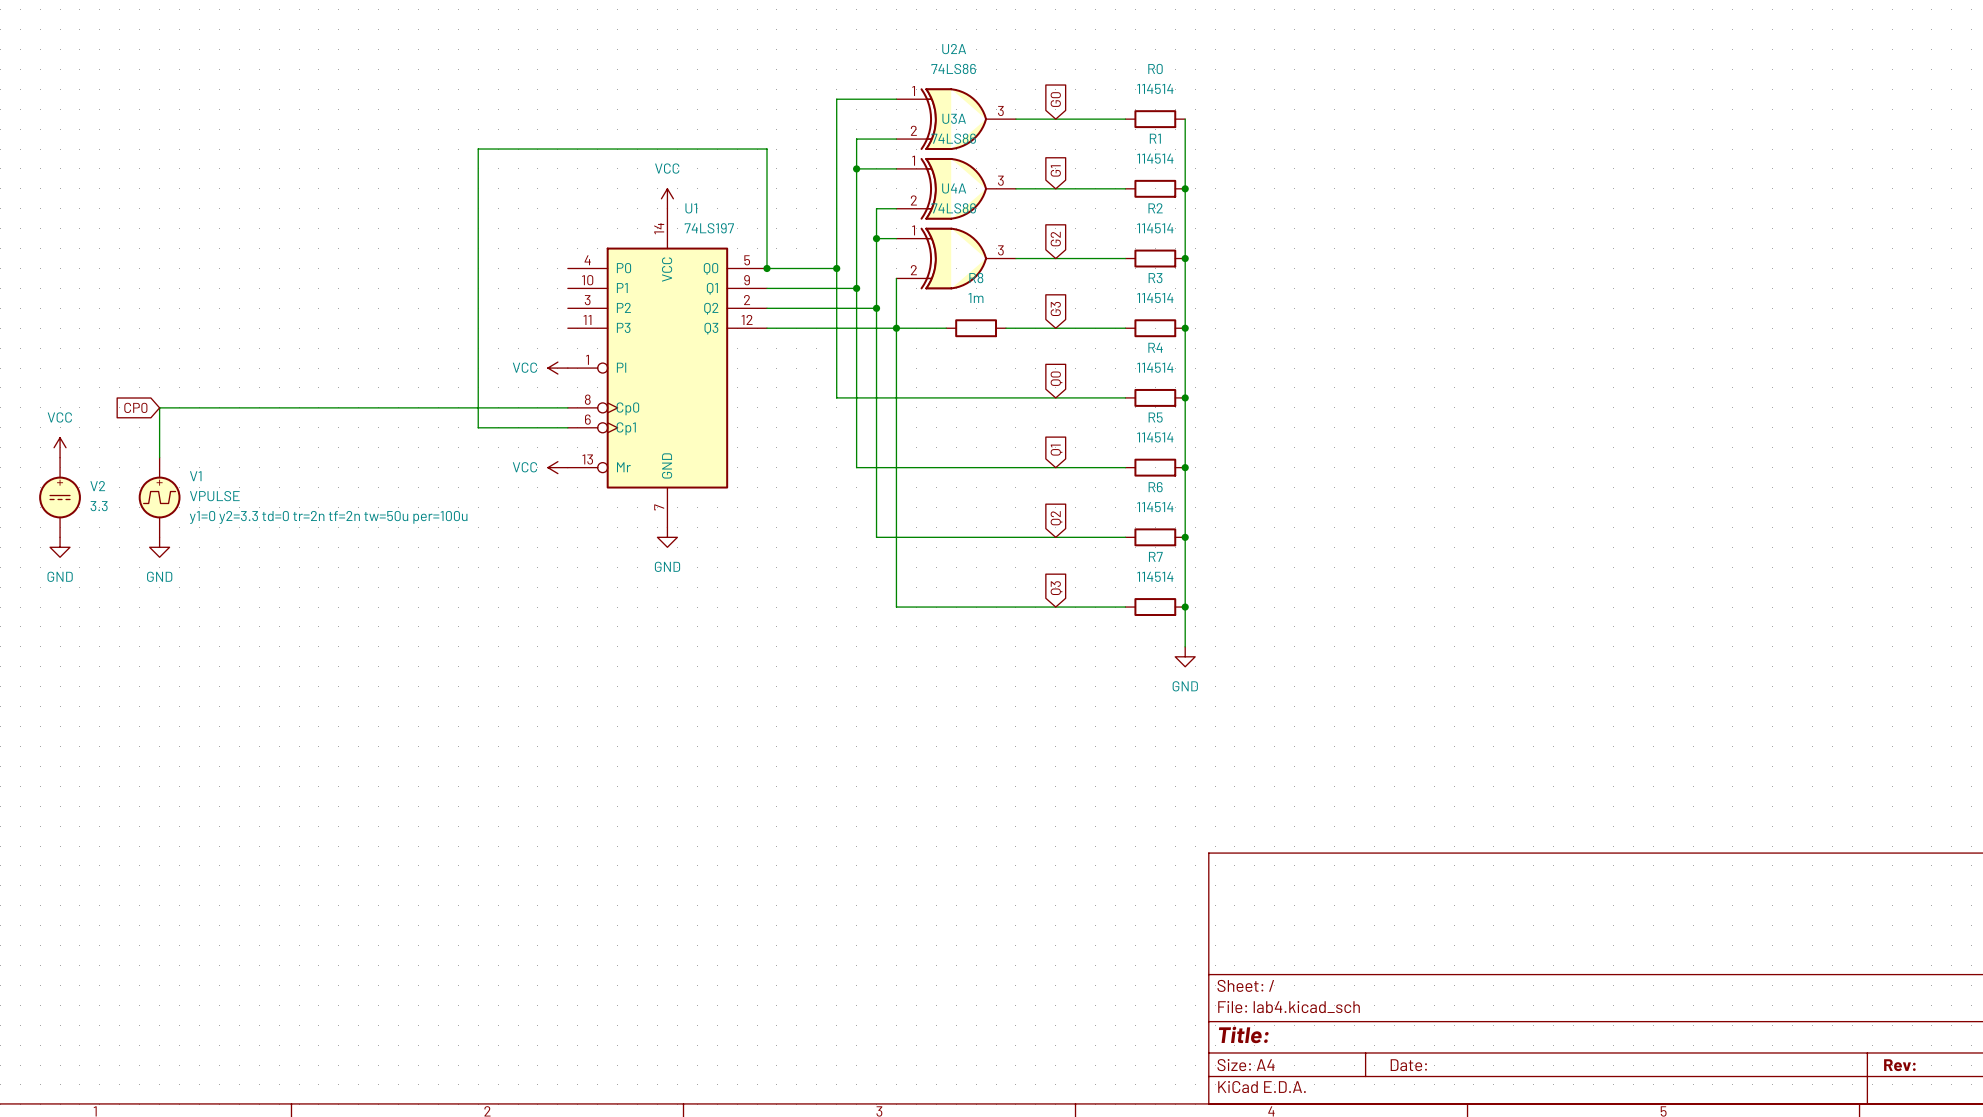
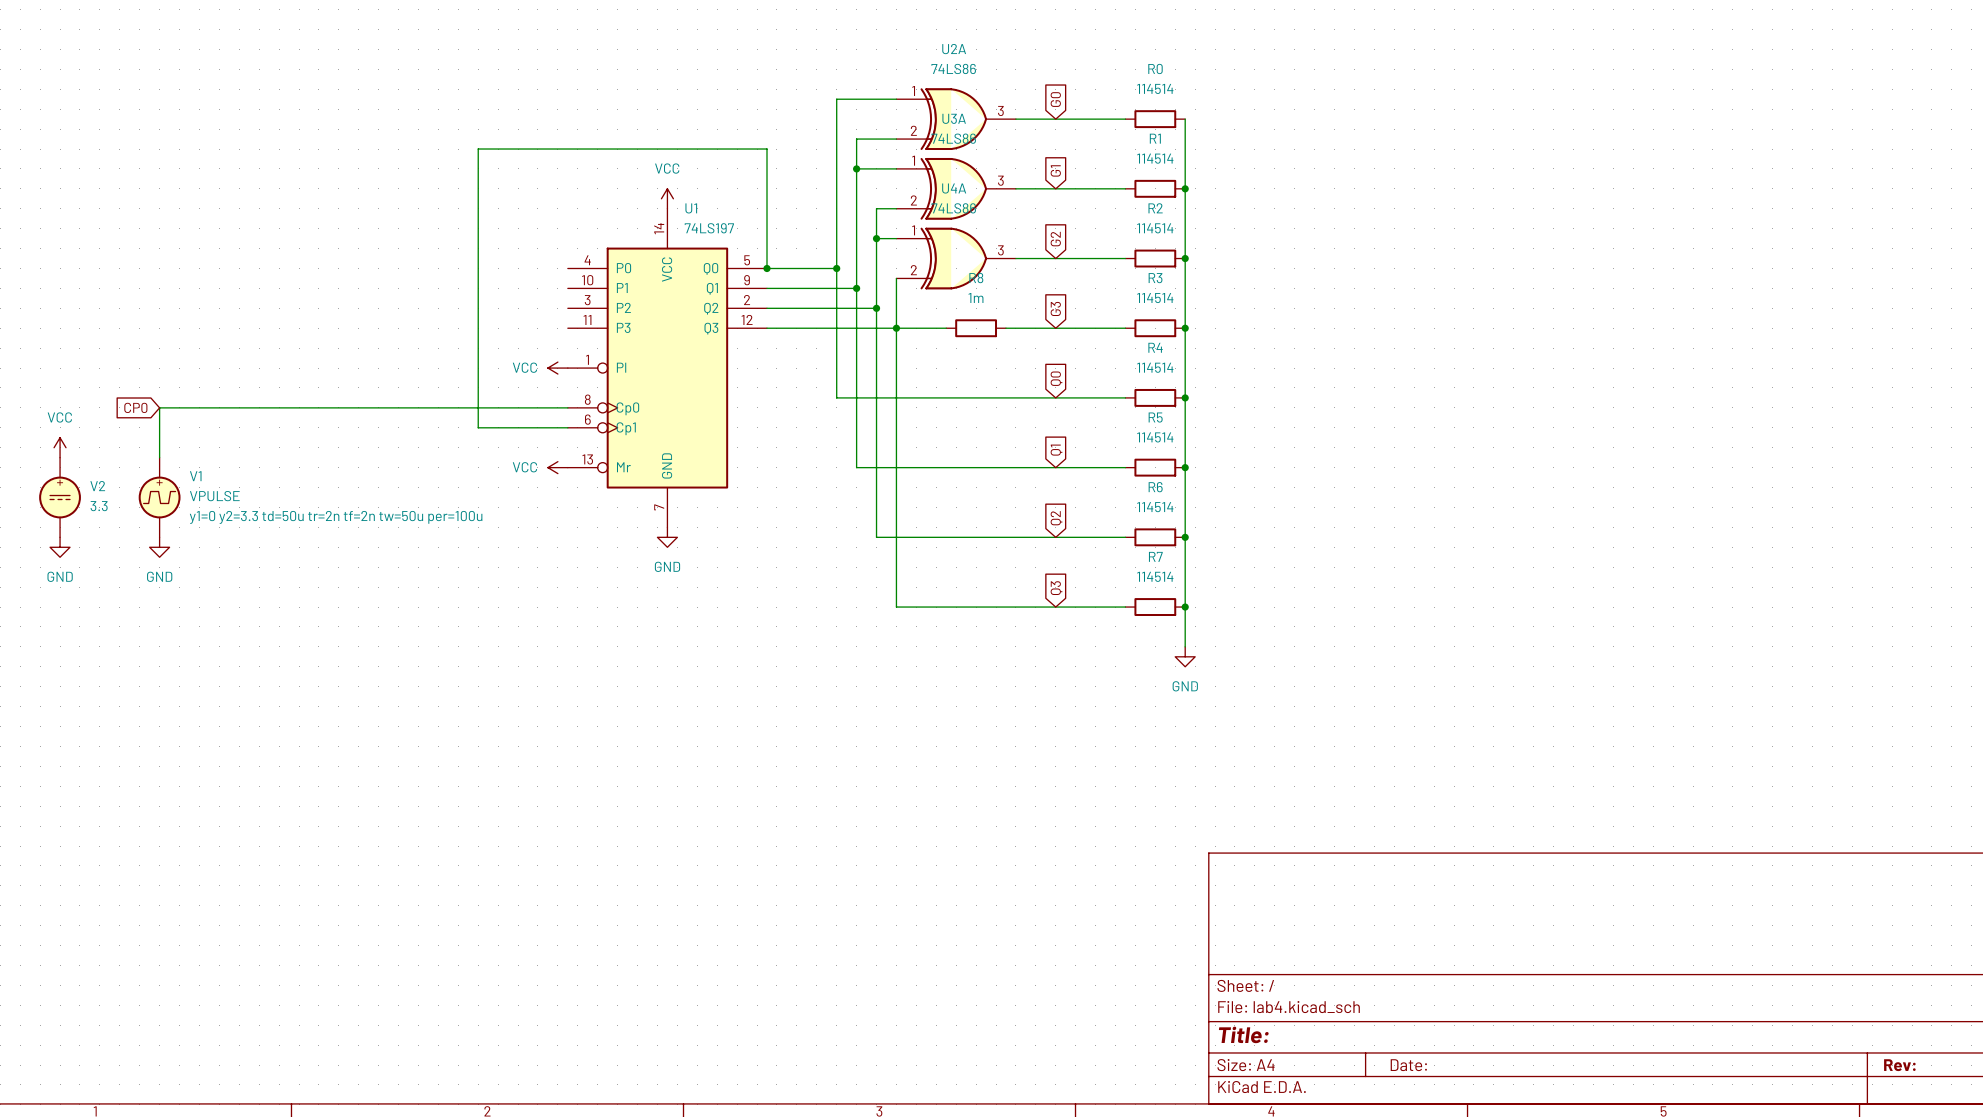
V1 text: y1=0 y2=3.3 td=0 tr=2n tf=2n tw=50u per=100u (328, 517) -> y1=0 y2=3.3 td=50u tr=2n tf=2n tw=50u per=100u (336, 517)

